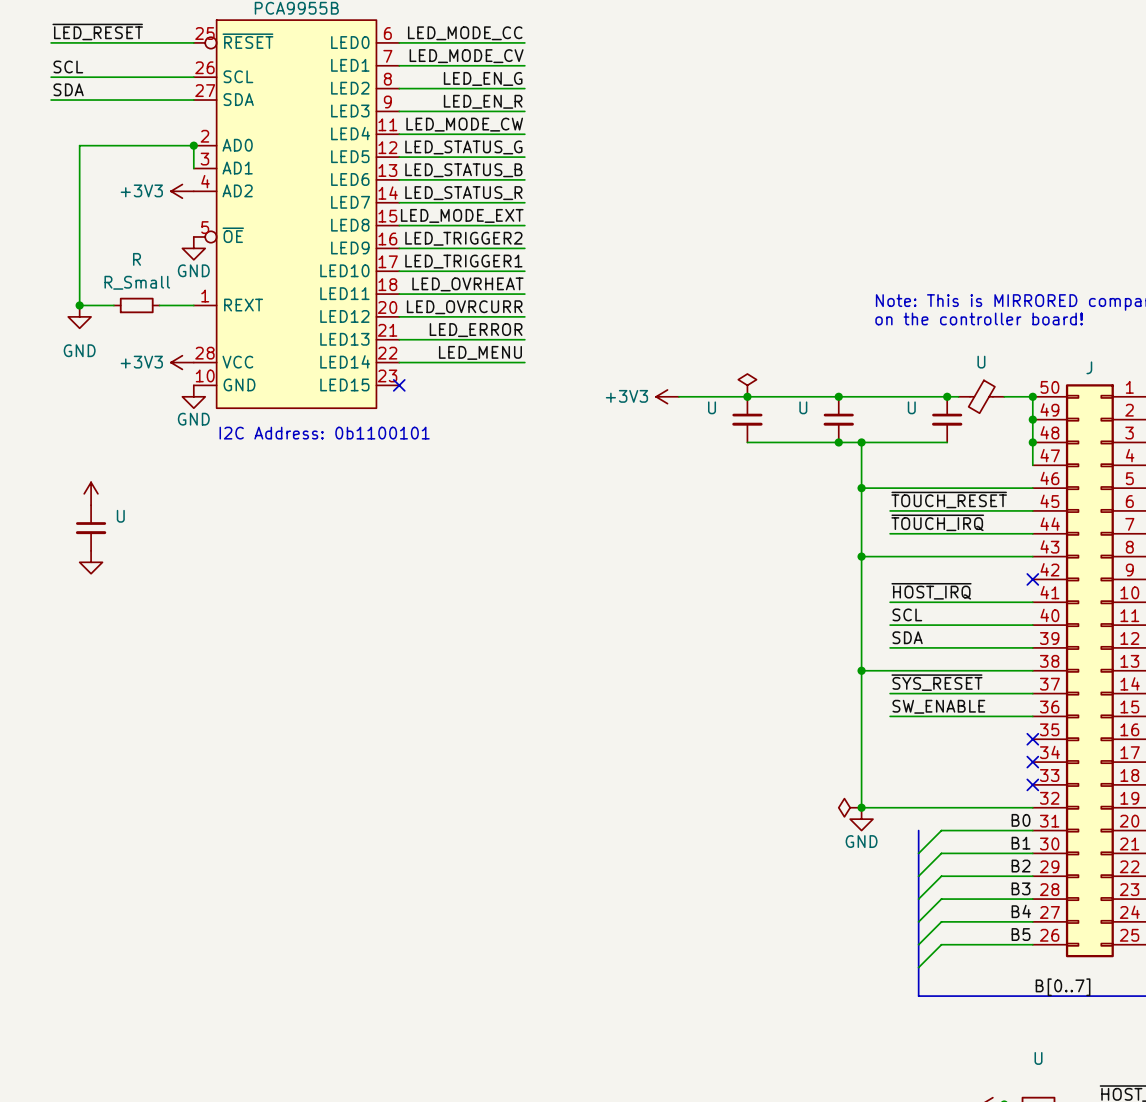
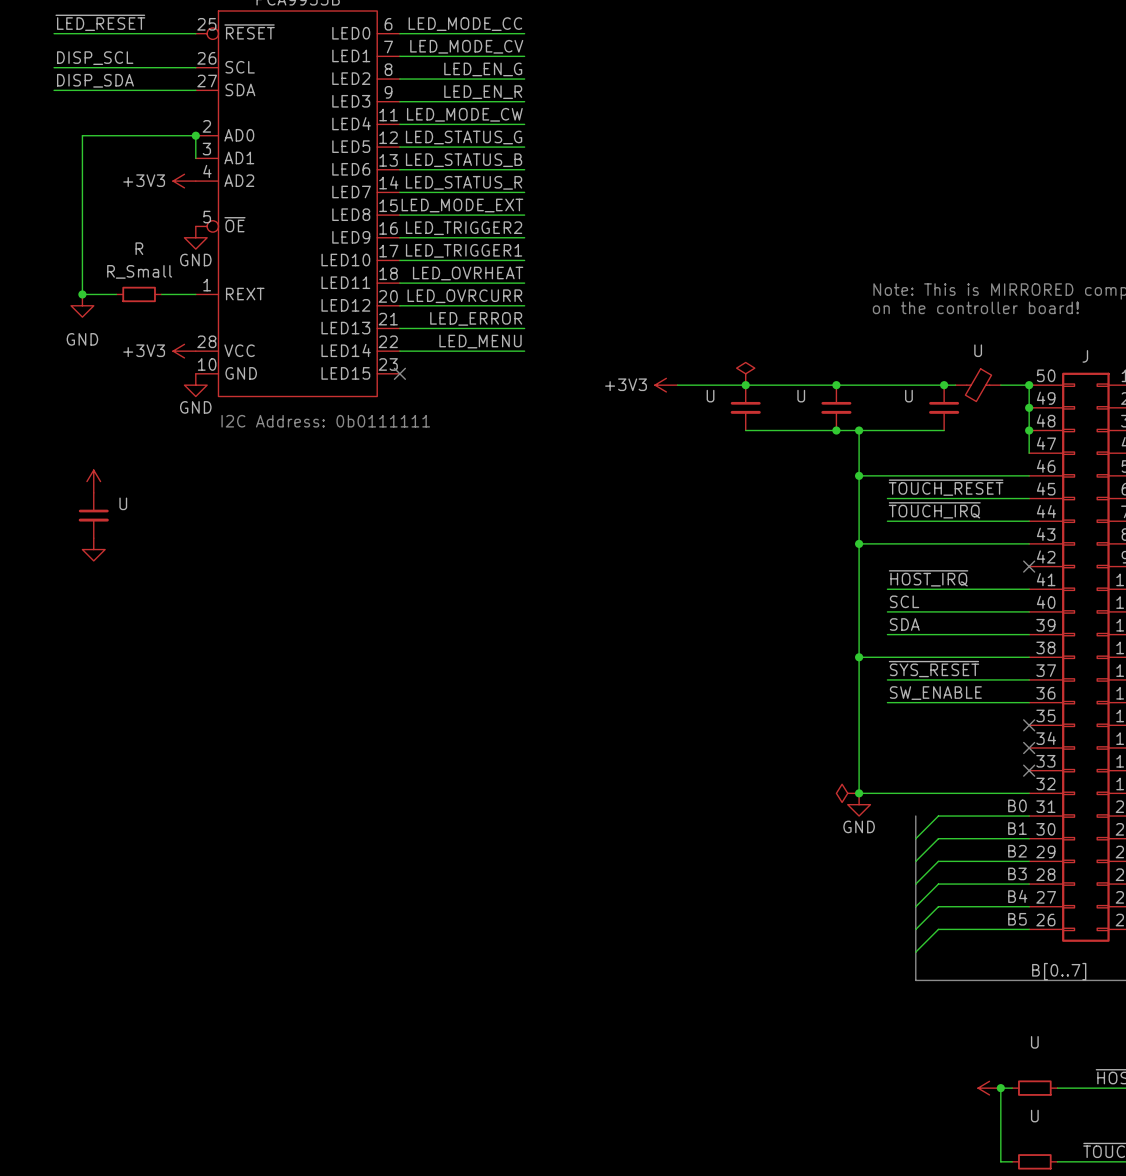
label: SCL (68, 66) -> DISP_SCL (95, 58)
label: SDA (68, 89) -> DISP_SDA (95, 80)
text: I2C Address: 0b1100101 (324, 433) -> I2C Address: 0b0111111 (325, 421)

